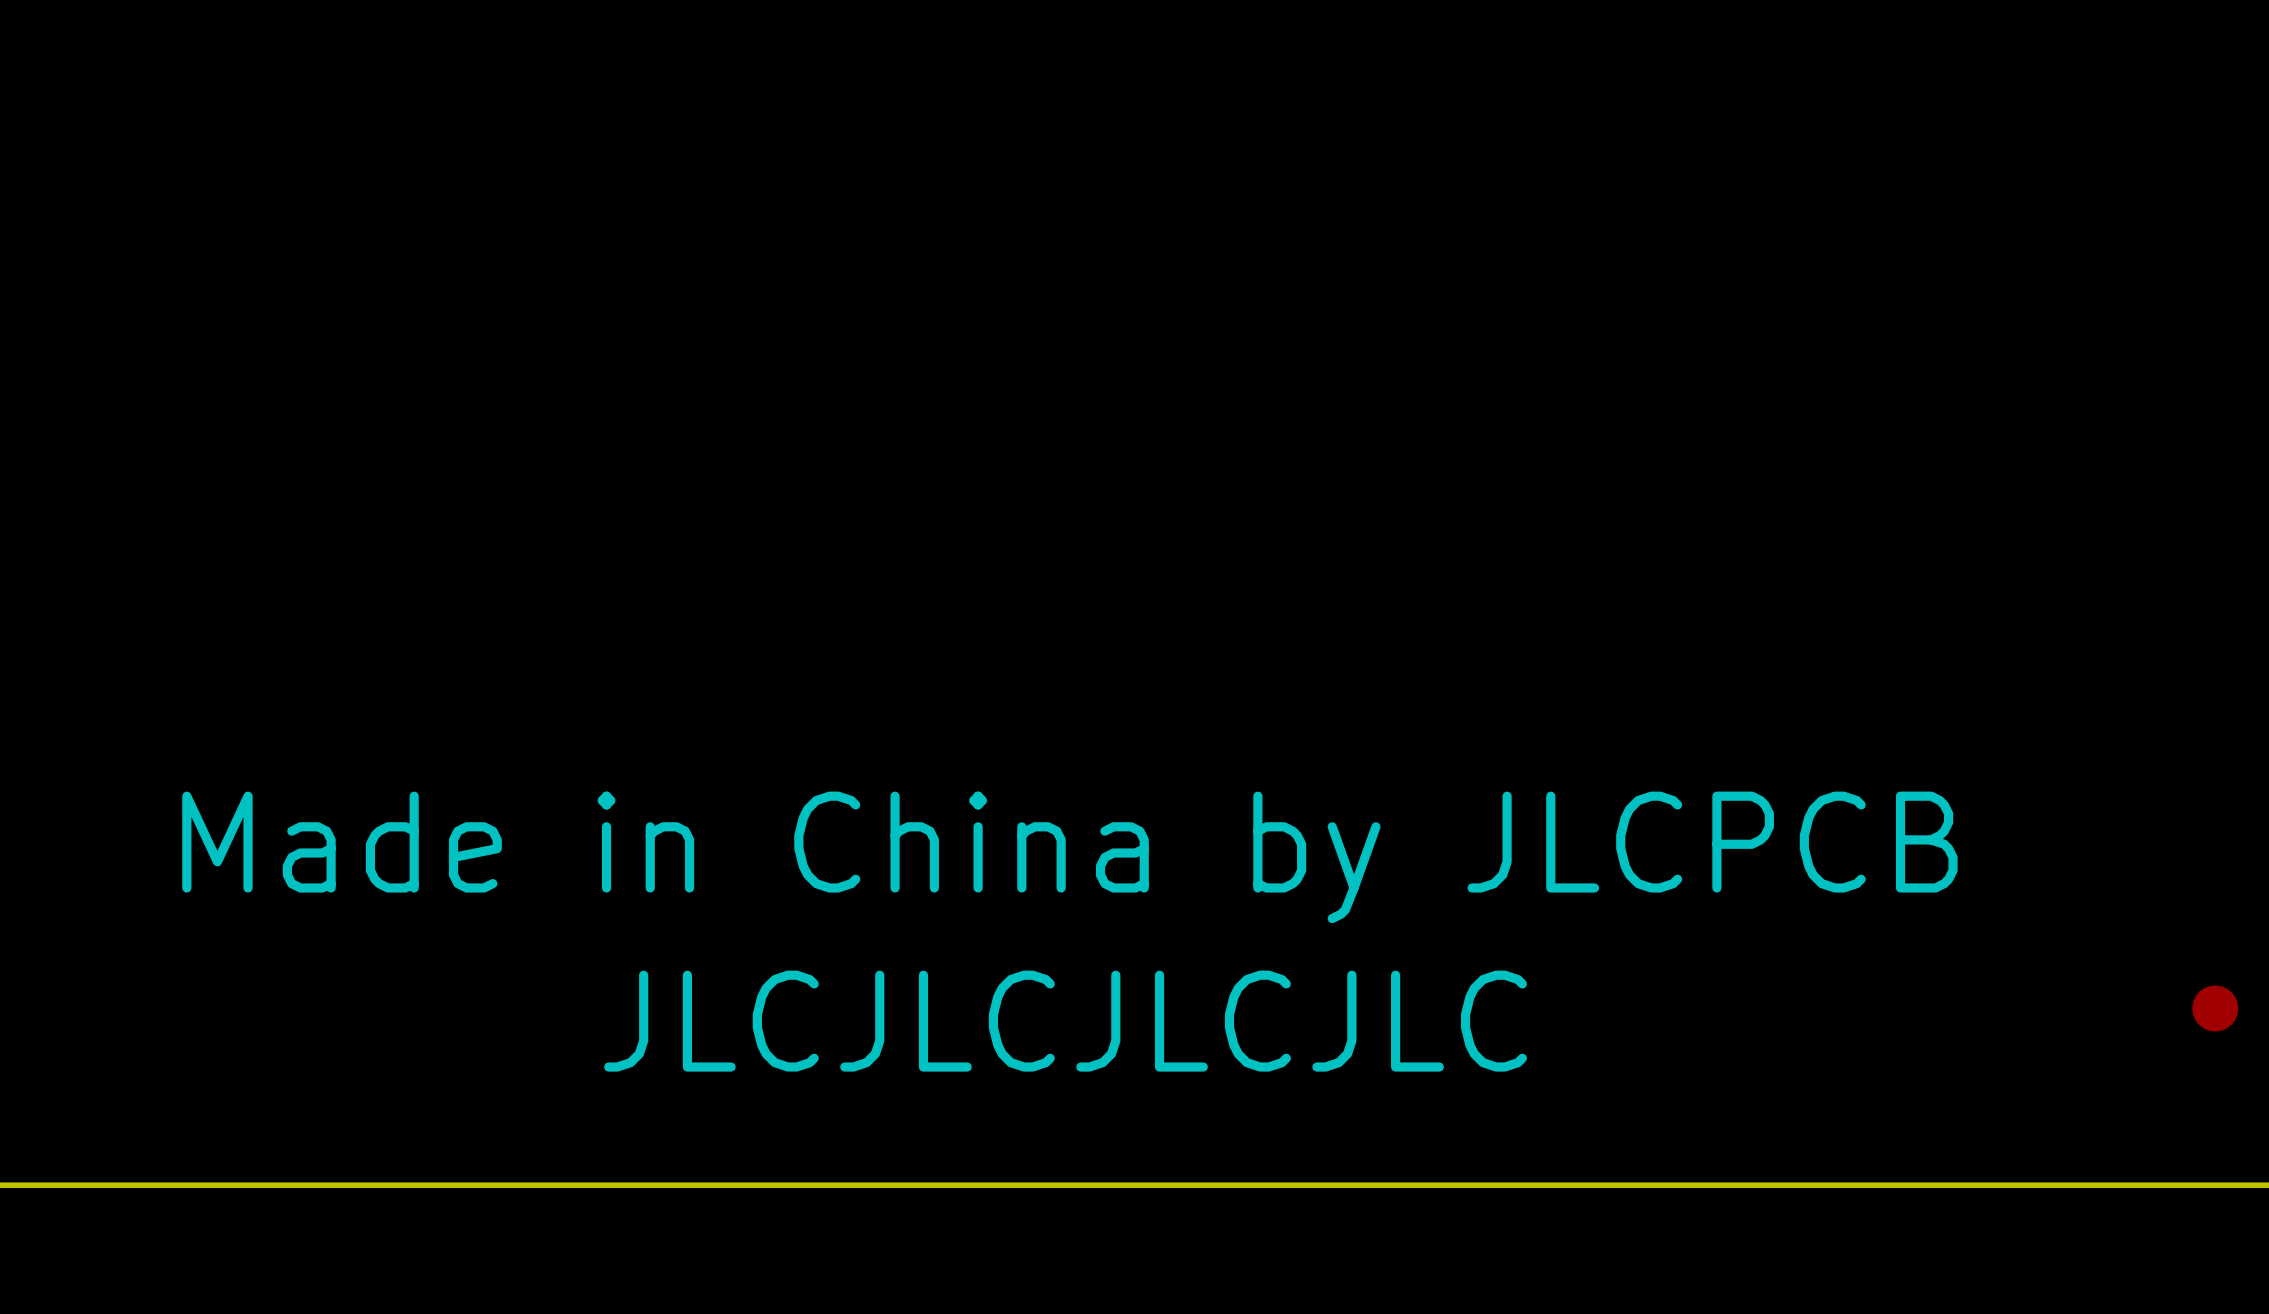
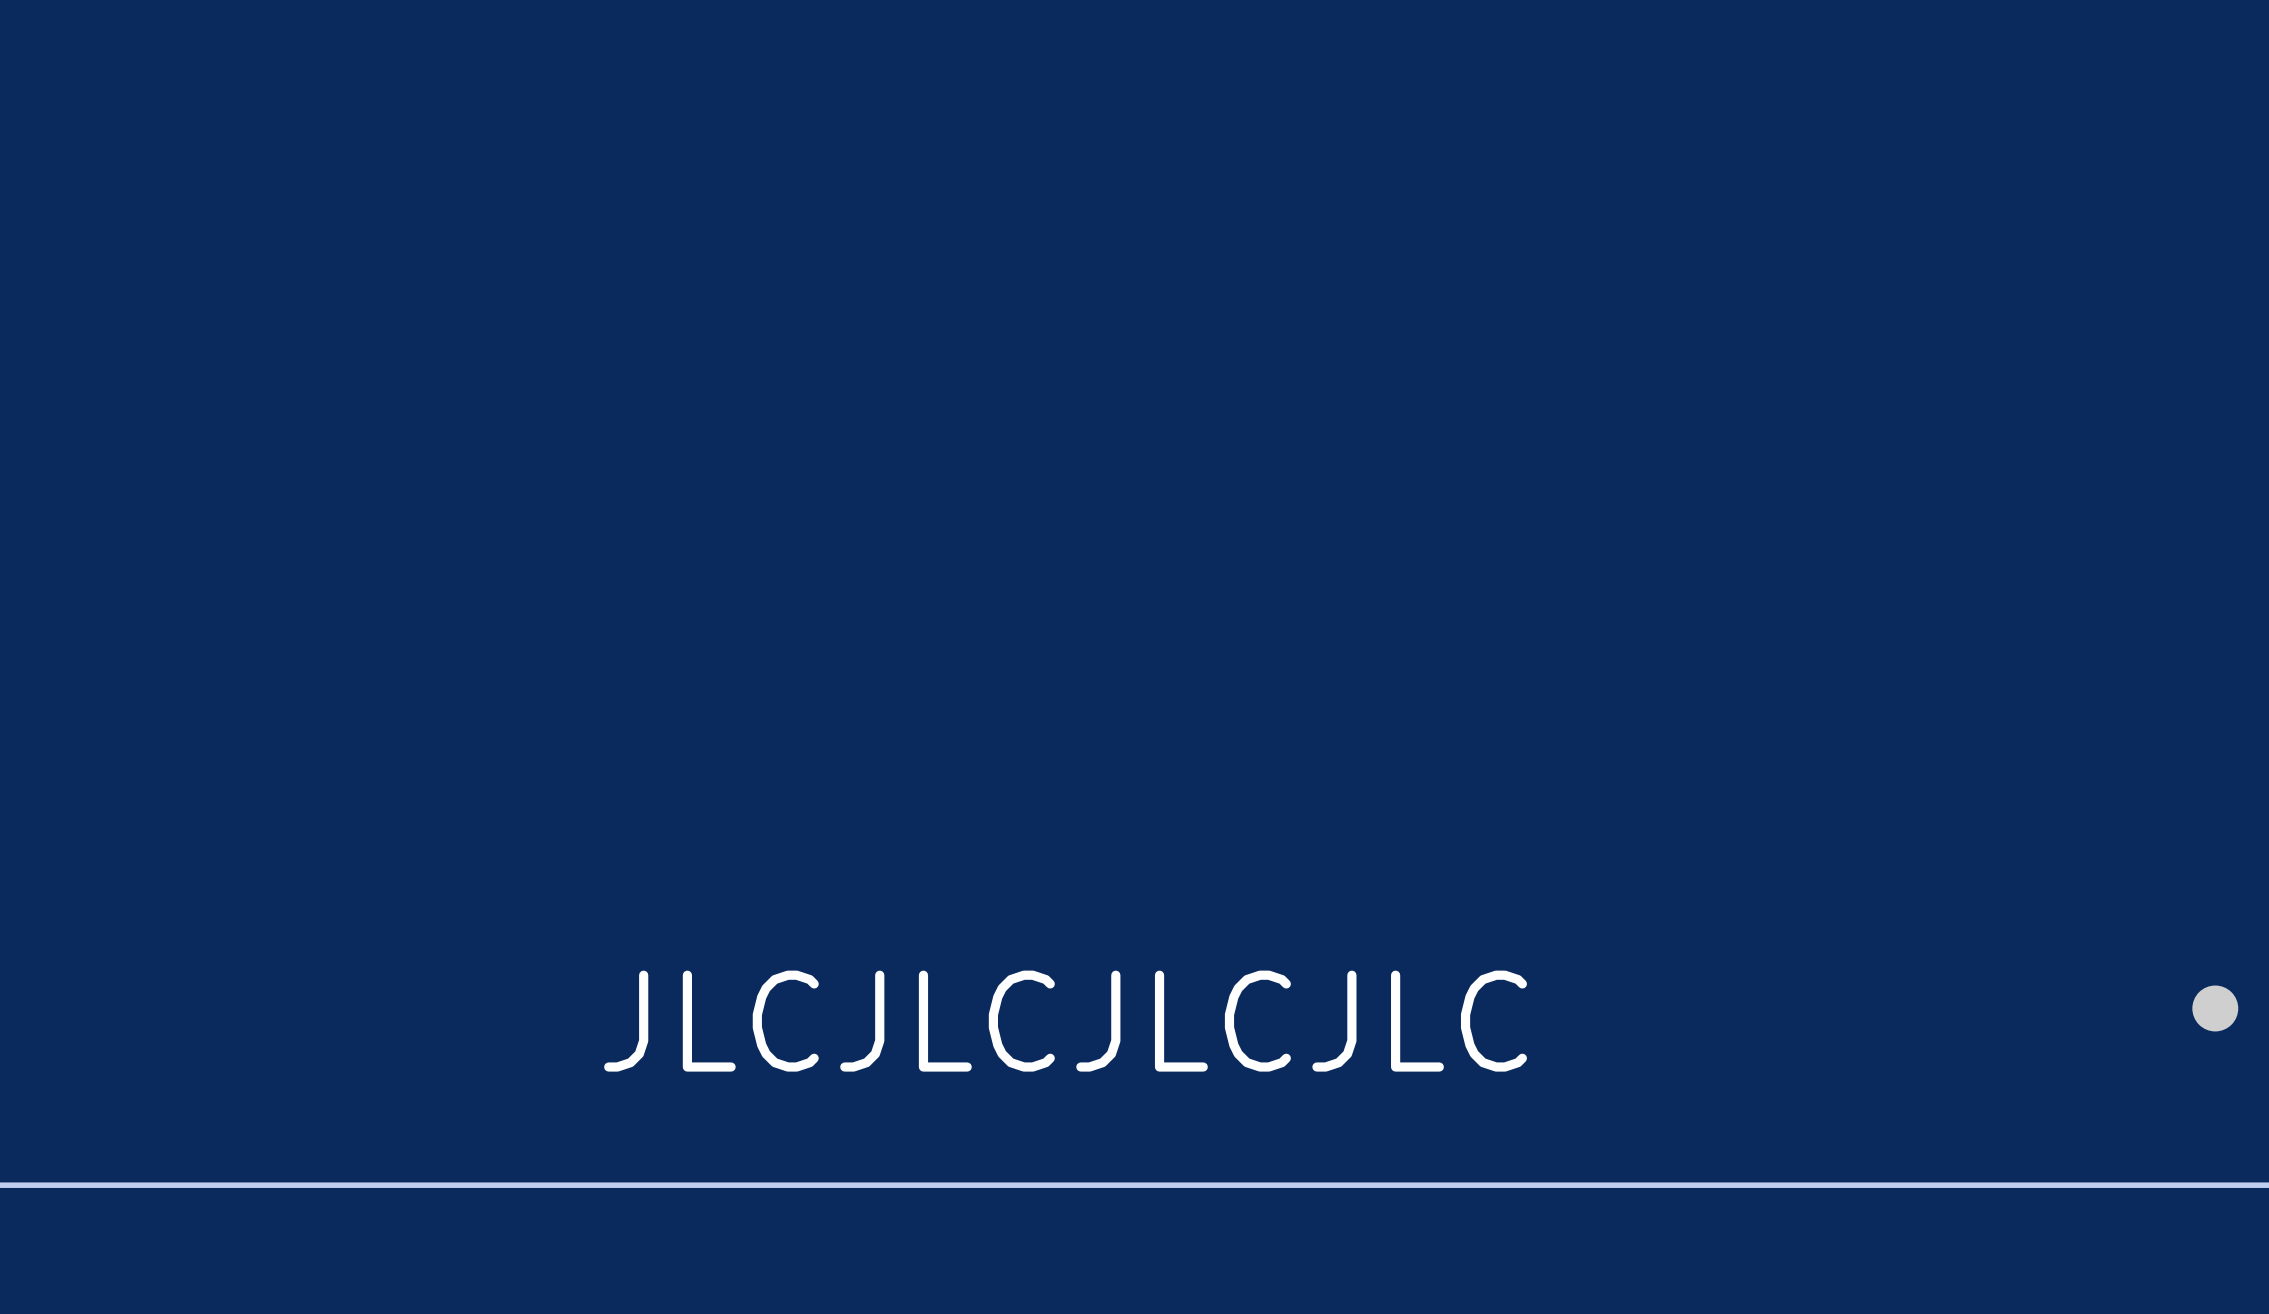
text: Made in China by JLCPCB (1069, 857) -> none

